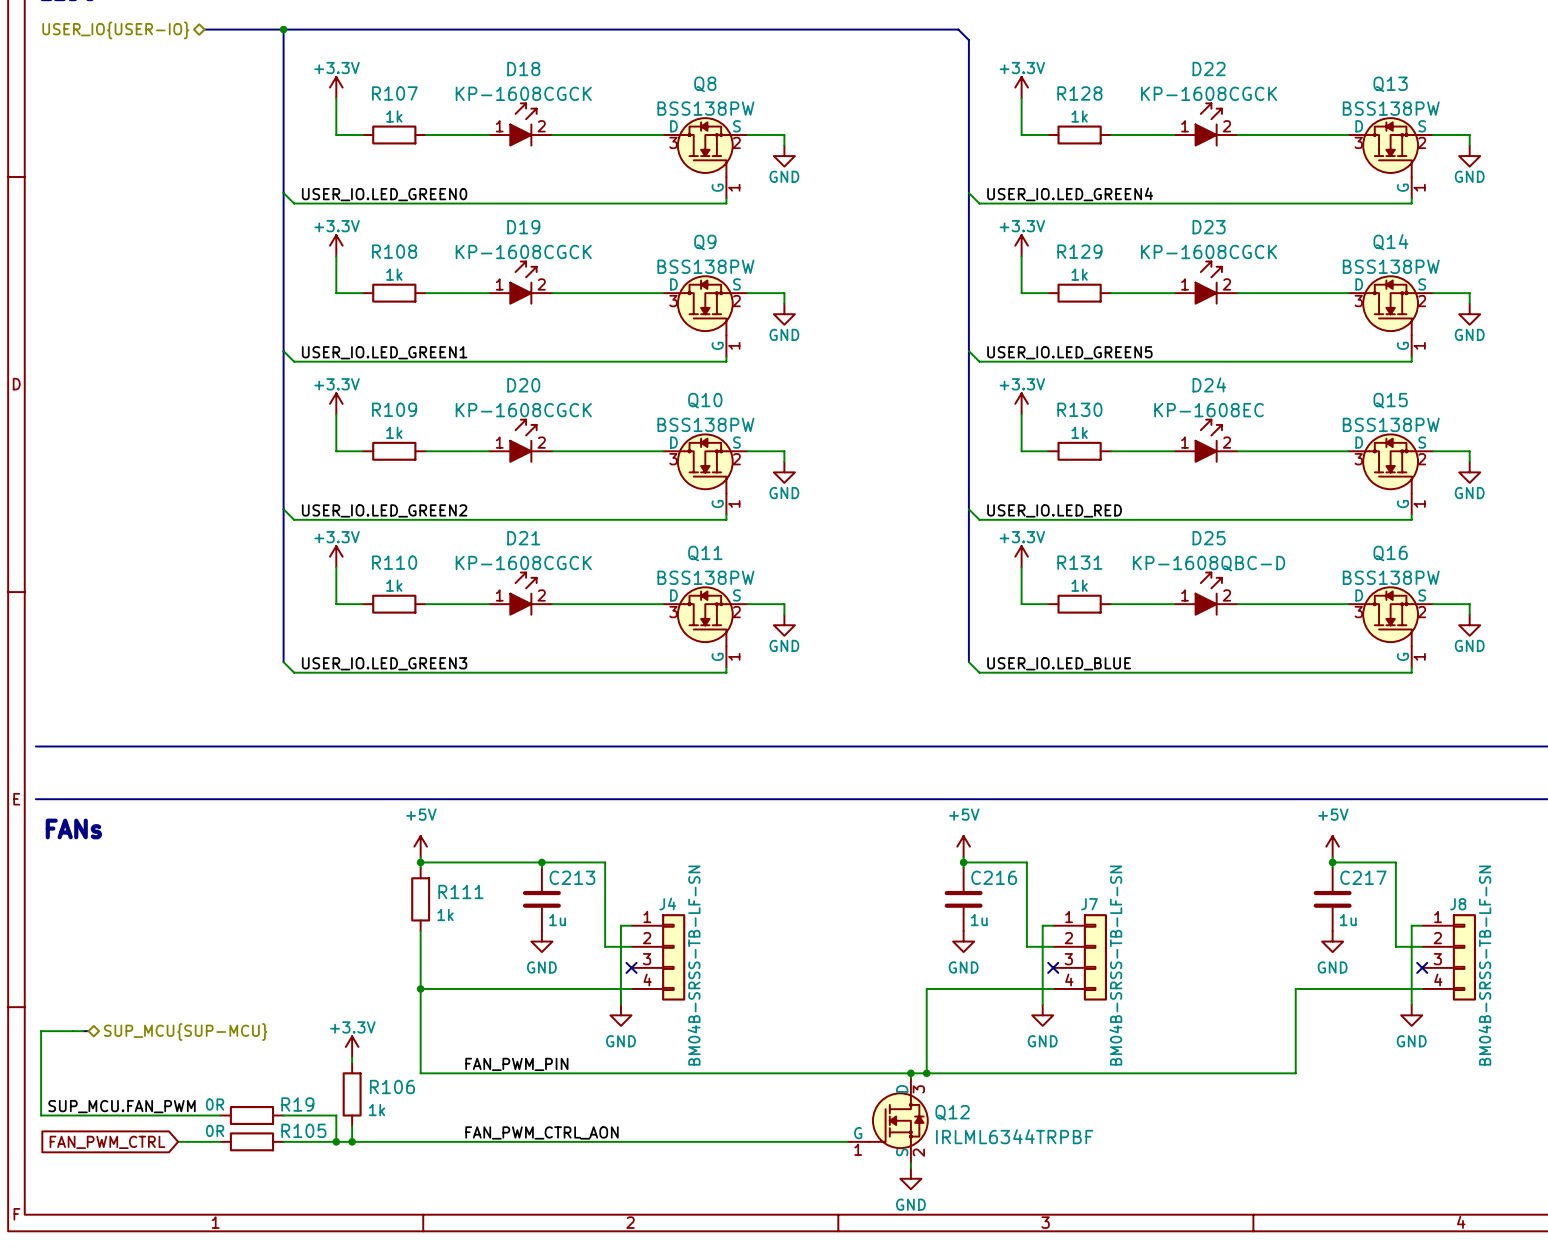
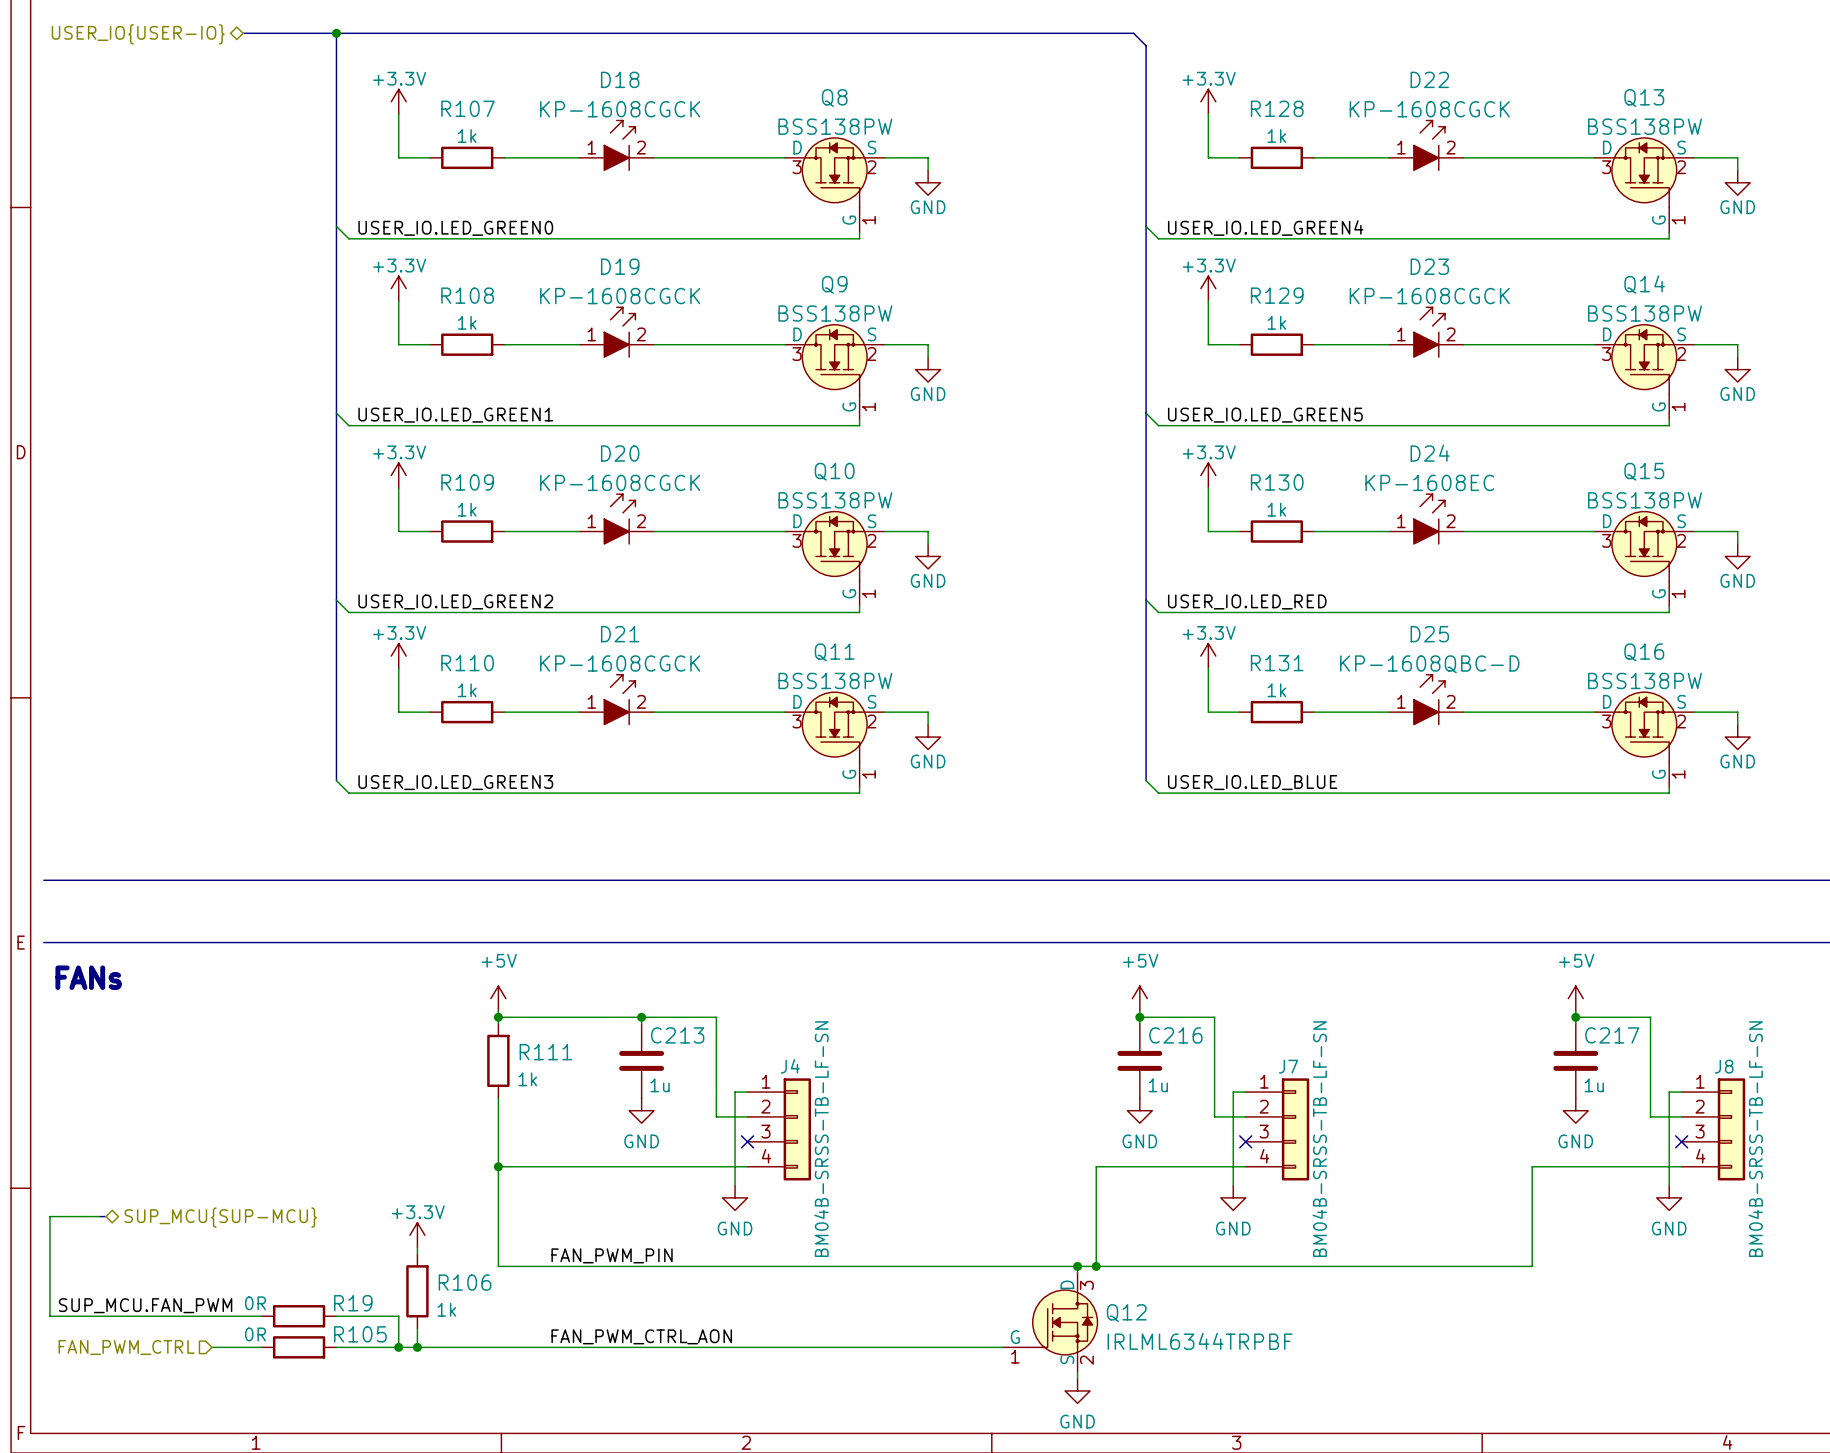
hierarchical label: none -> FAN_PWM_CTRL (126, 1347)
global label: FAN_PWM_CTRL (107, 1142) -> none

